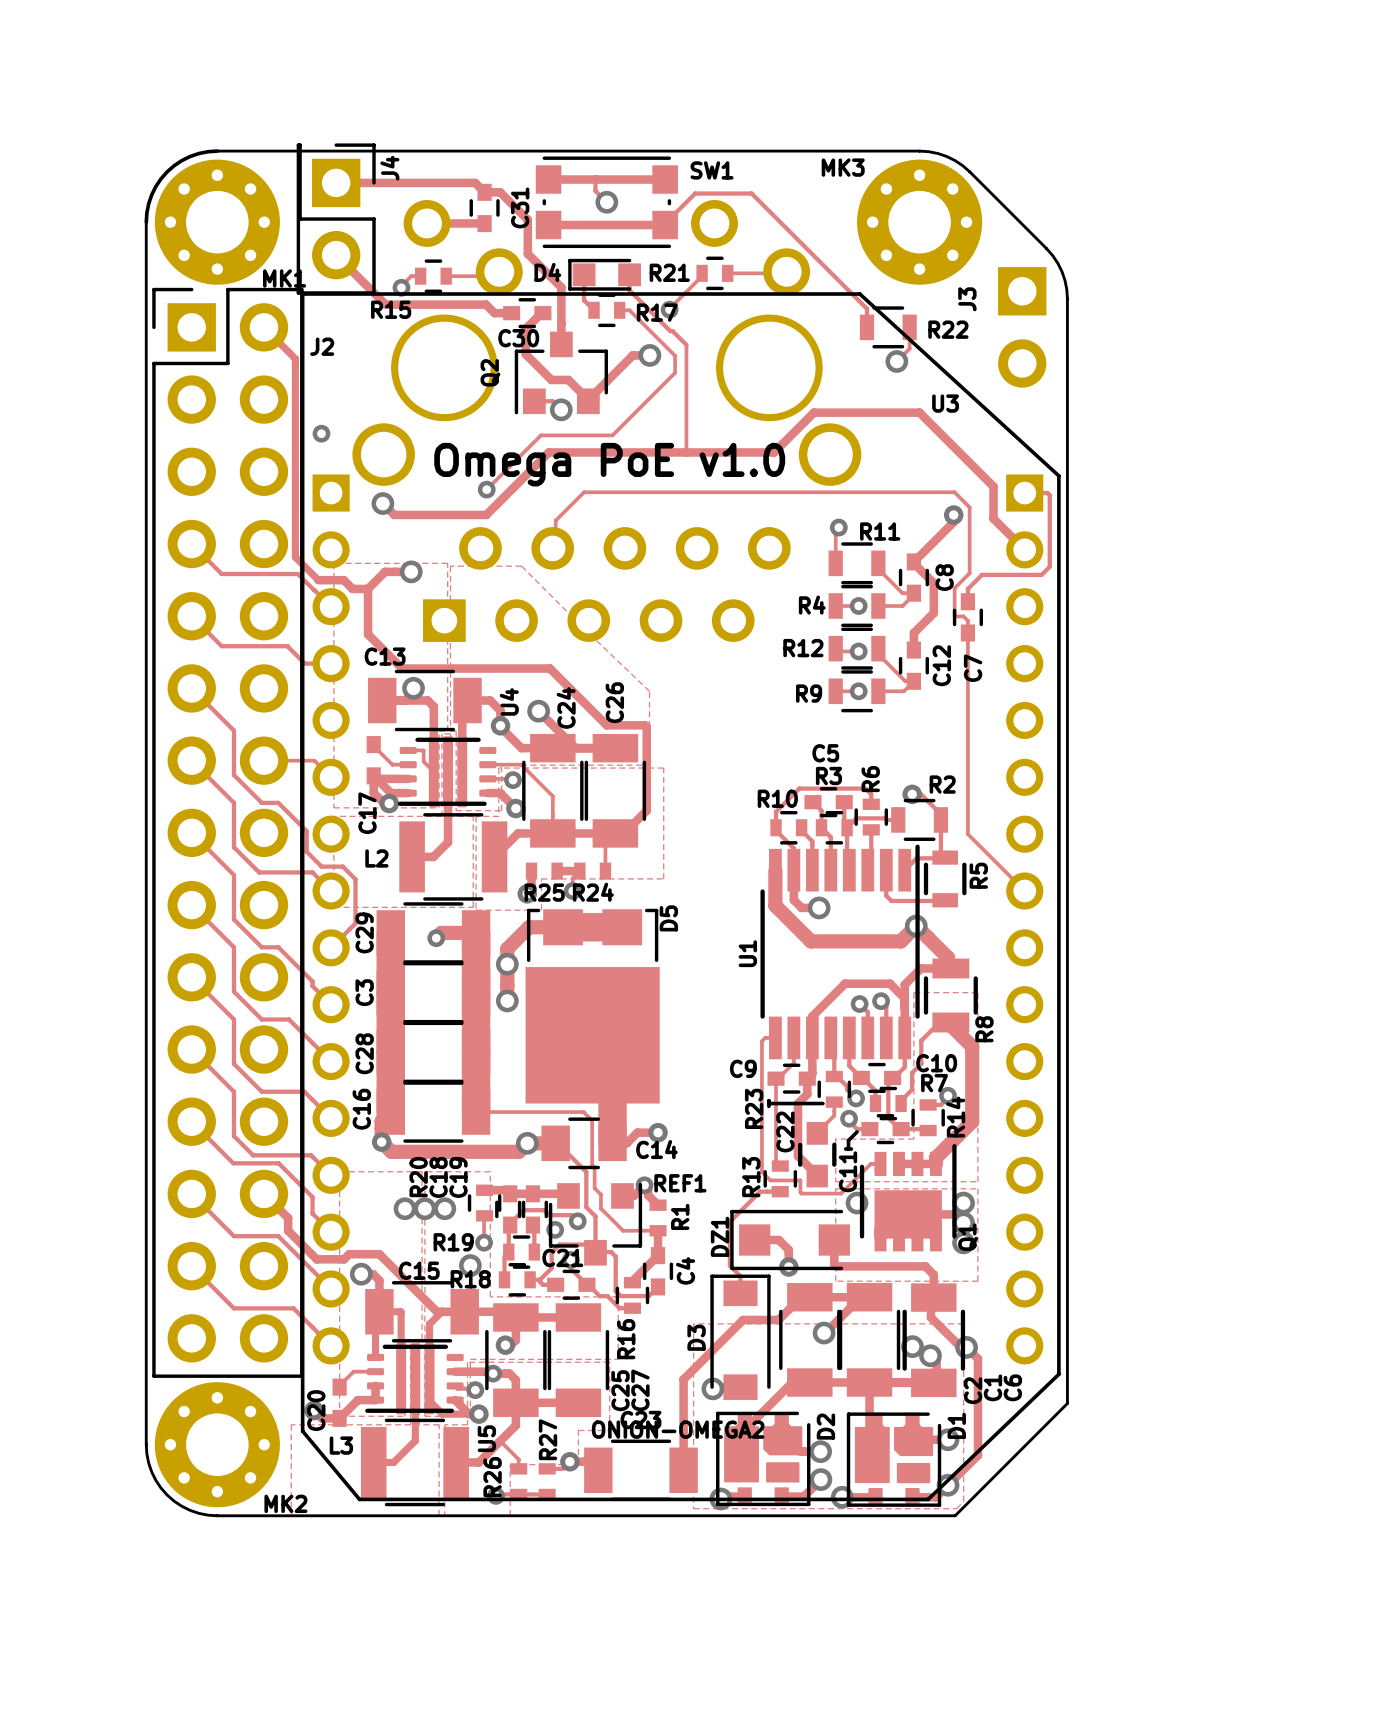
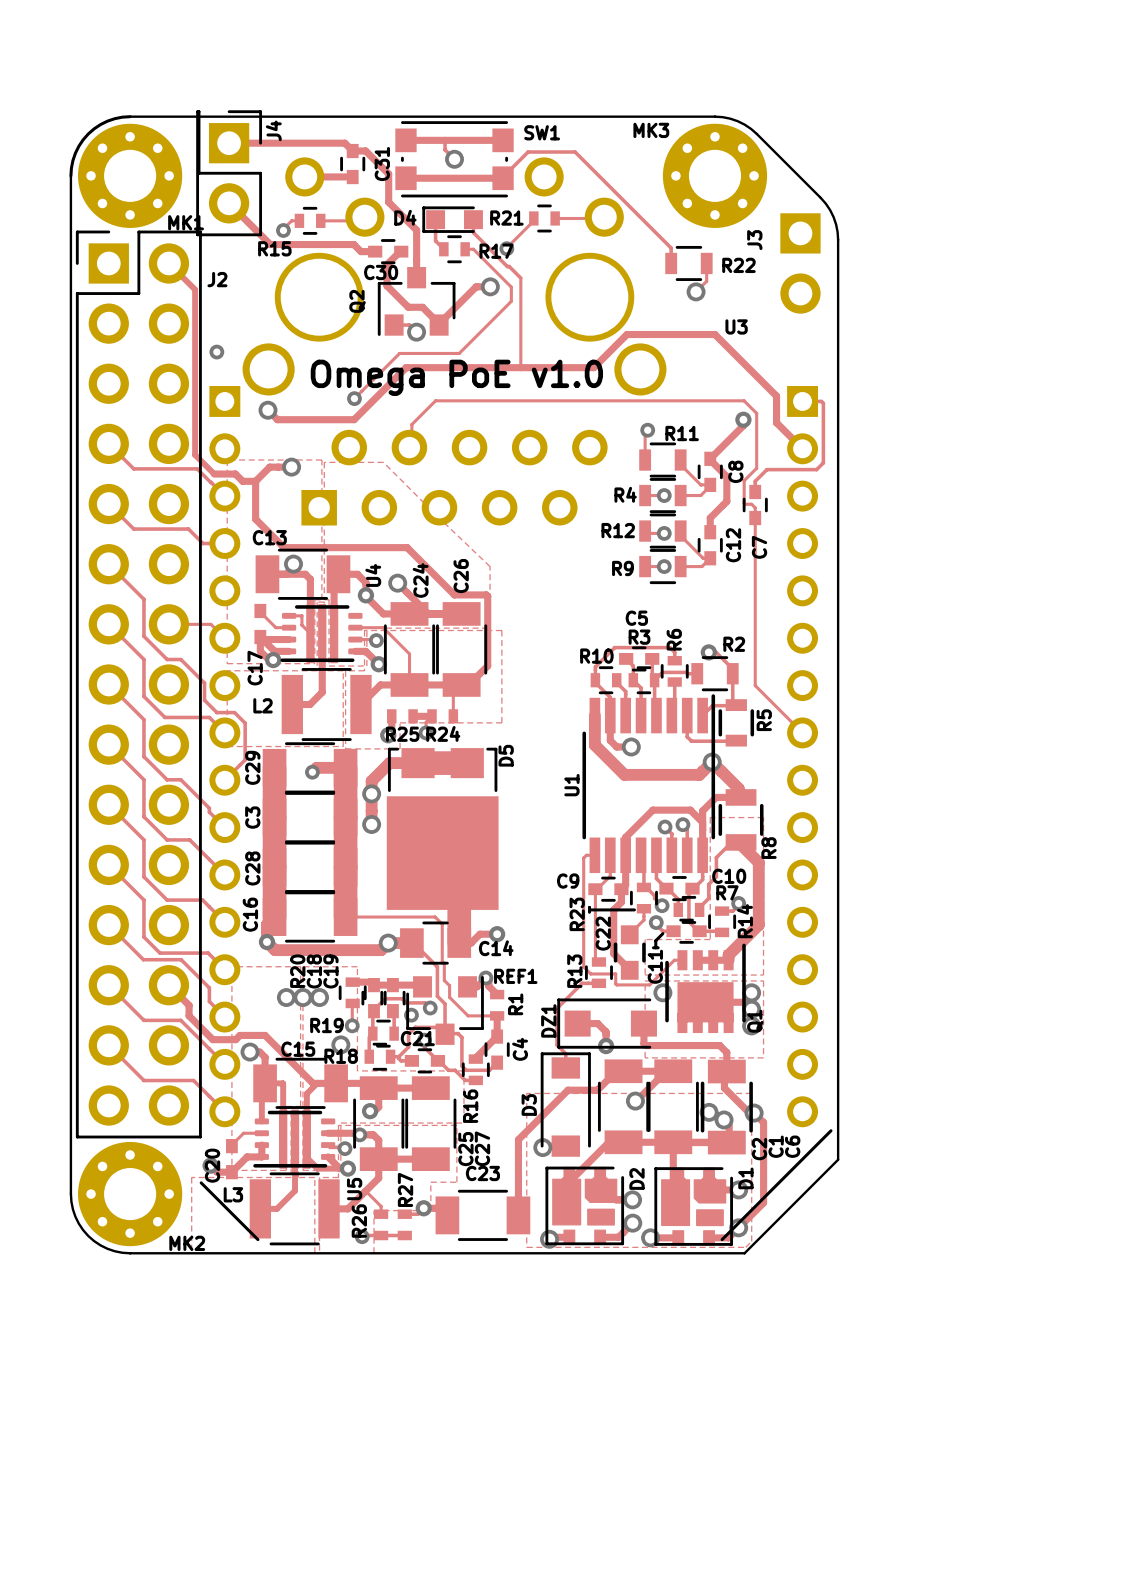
U3 footprint: [300, 292, 1061, 1502] -> [199, 386, 833, 1242]
U3 value: ONION-OMEGA2 (678, 1429) -> none

